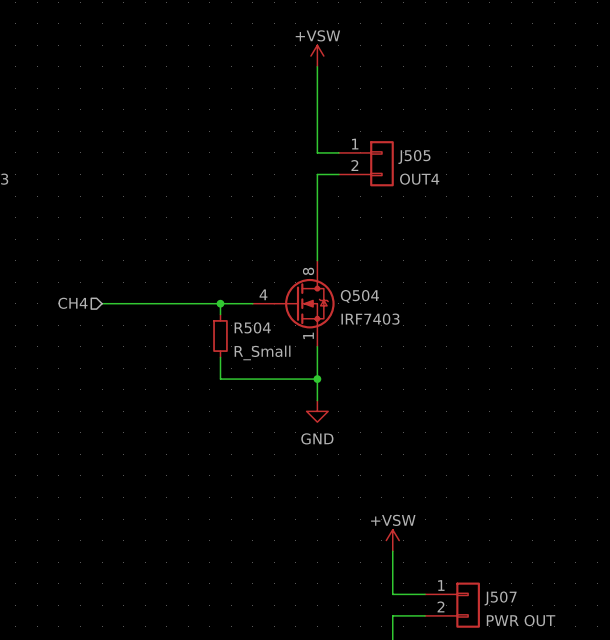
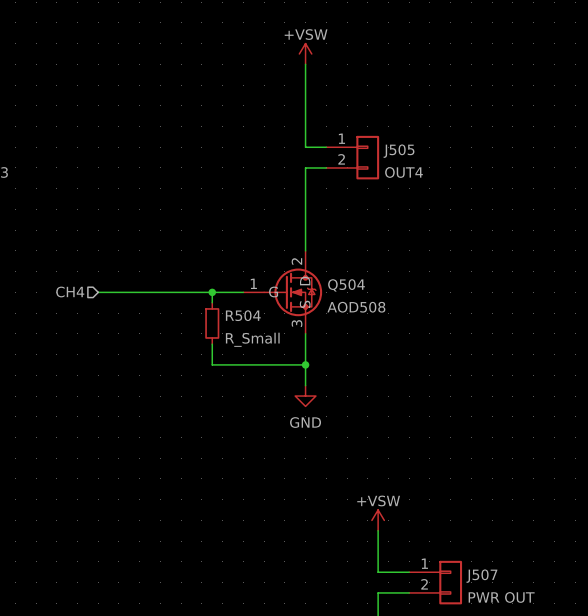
Q504 pin number: 8 (308, 271) -> 2 (296, 261)
Q504 pin name: none -> D (305, 280)
Q504 pin number: 4 (263, 294) -> 1 (253, 283)
Q504 pin name: none -> G (273, 292)
Q504 pin name: none -> S (305, 304)
Q504 value: IRF7403 (370, 319) -> AOD508 (356, 307)
Q504 pin number: 1 (308, 335) -> 3 (297, 323)

